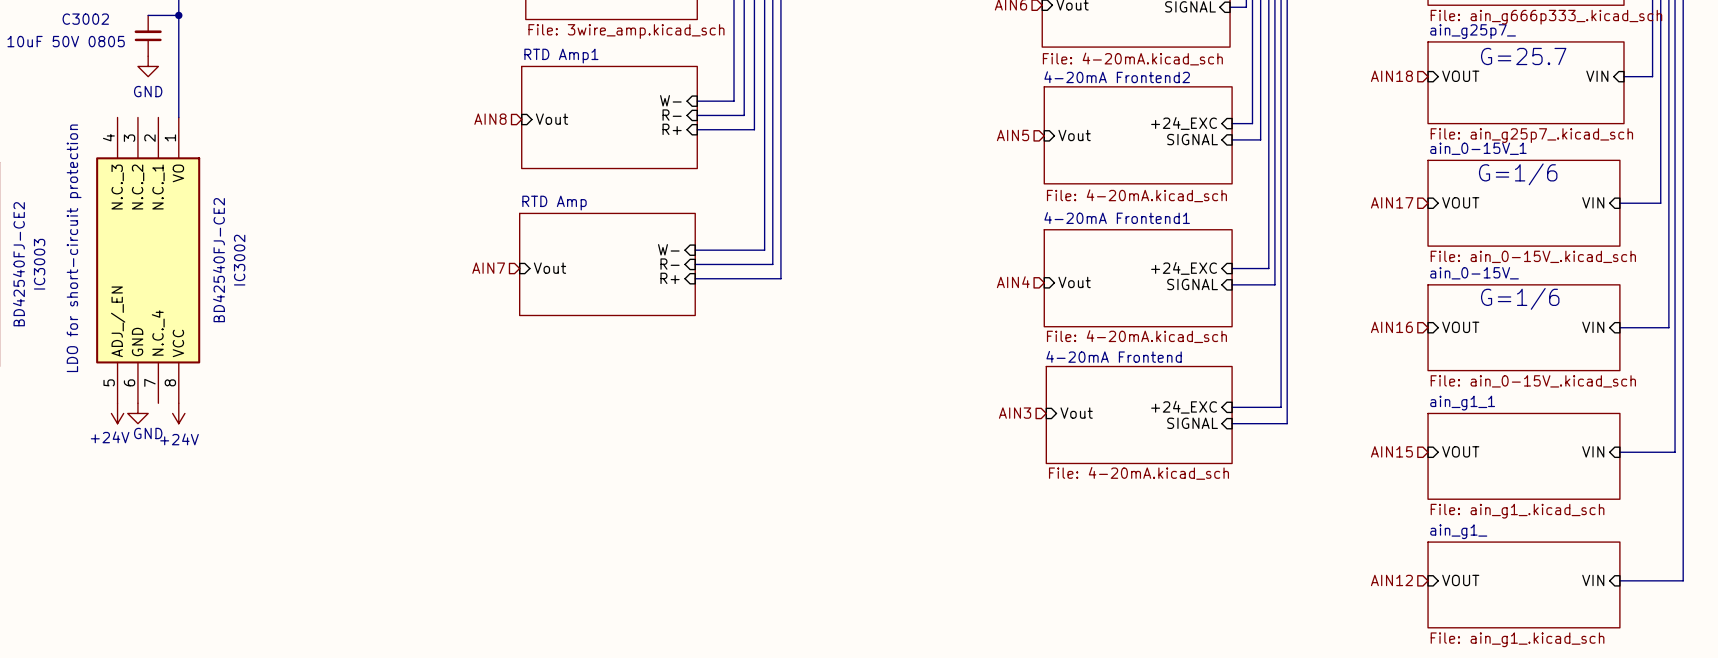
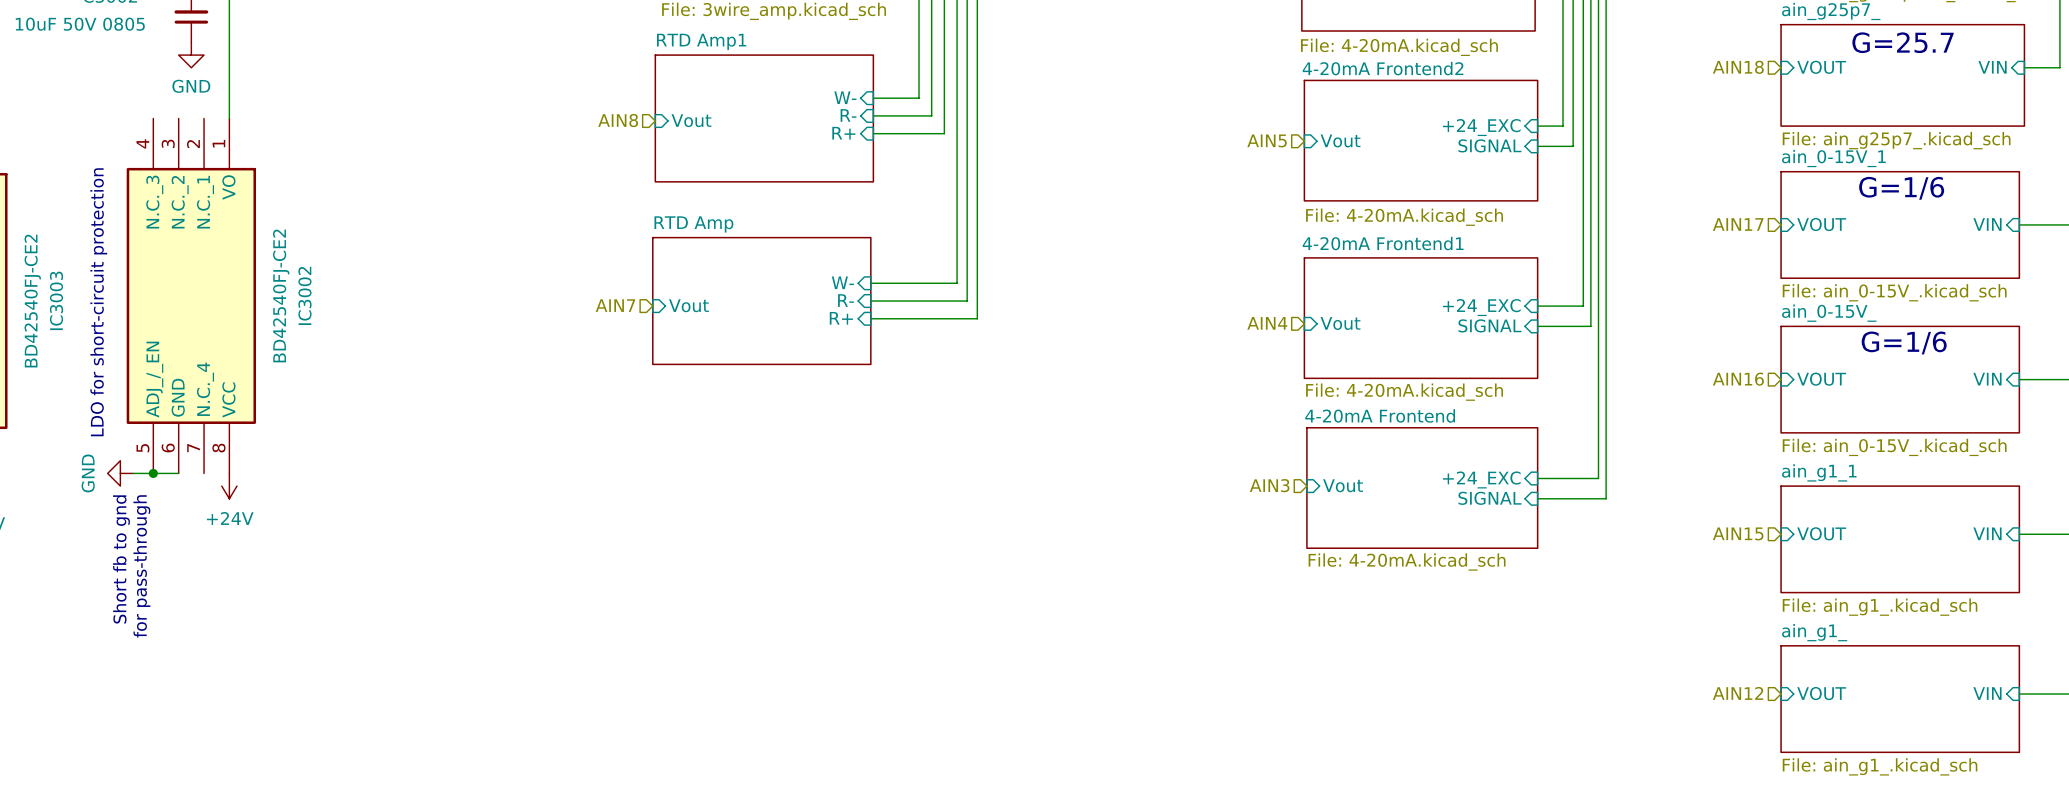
wire: none -> (133, 473) (178, 473)
junction: none -> (153, 473)
power symbol: +24V (117, 413) -> none
power symbol rotation: 0° (137, 413) -> 90° clockwise (120, 473)
power symbol position: GND (137, 413) -> GND (120, 473)
text: none -> Short fb to gnd (121, 559)
text: none -> for pass-through (141, 566)

